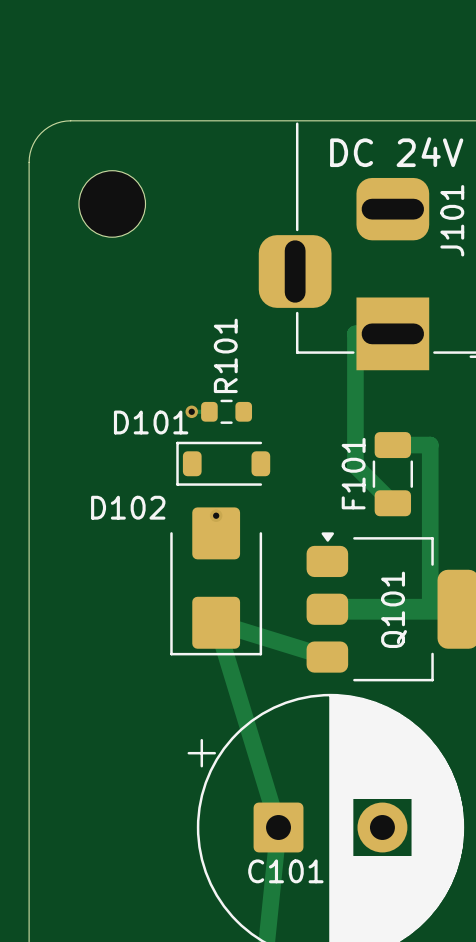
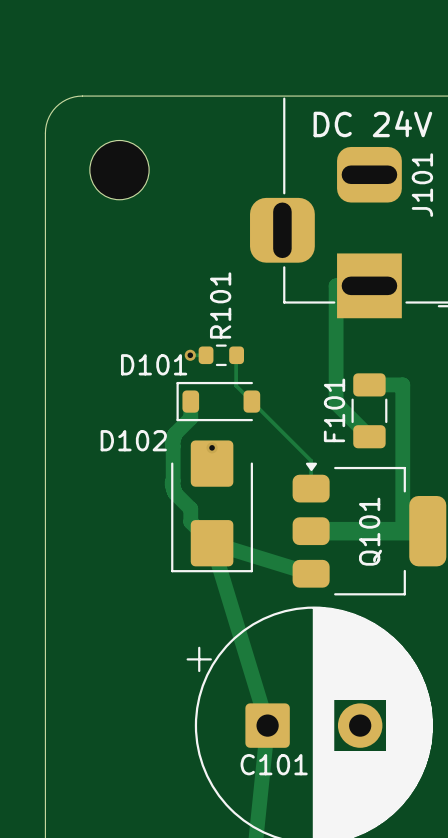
track: none -> (236, 355) (236, 385) (311, 460) (311, 488)
track: none -> (190, 401) (190, 418) (175, 433) (172, 442) (172, 484) (175, 493) (190, 508) (190, 521) (212, 543)

